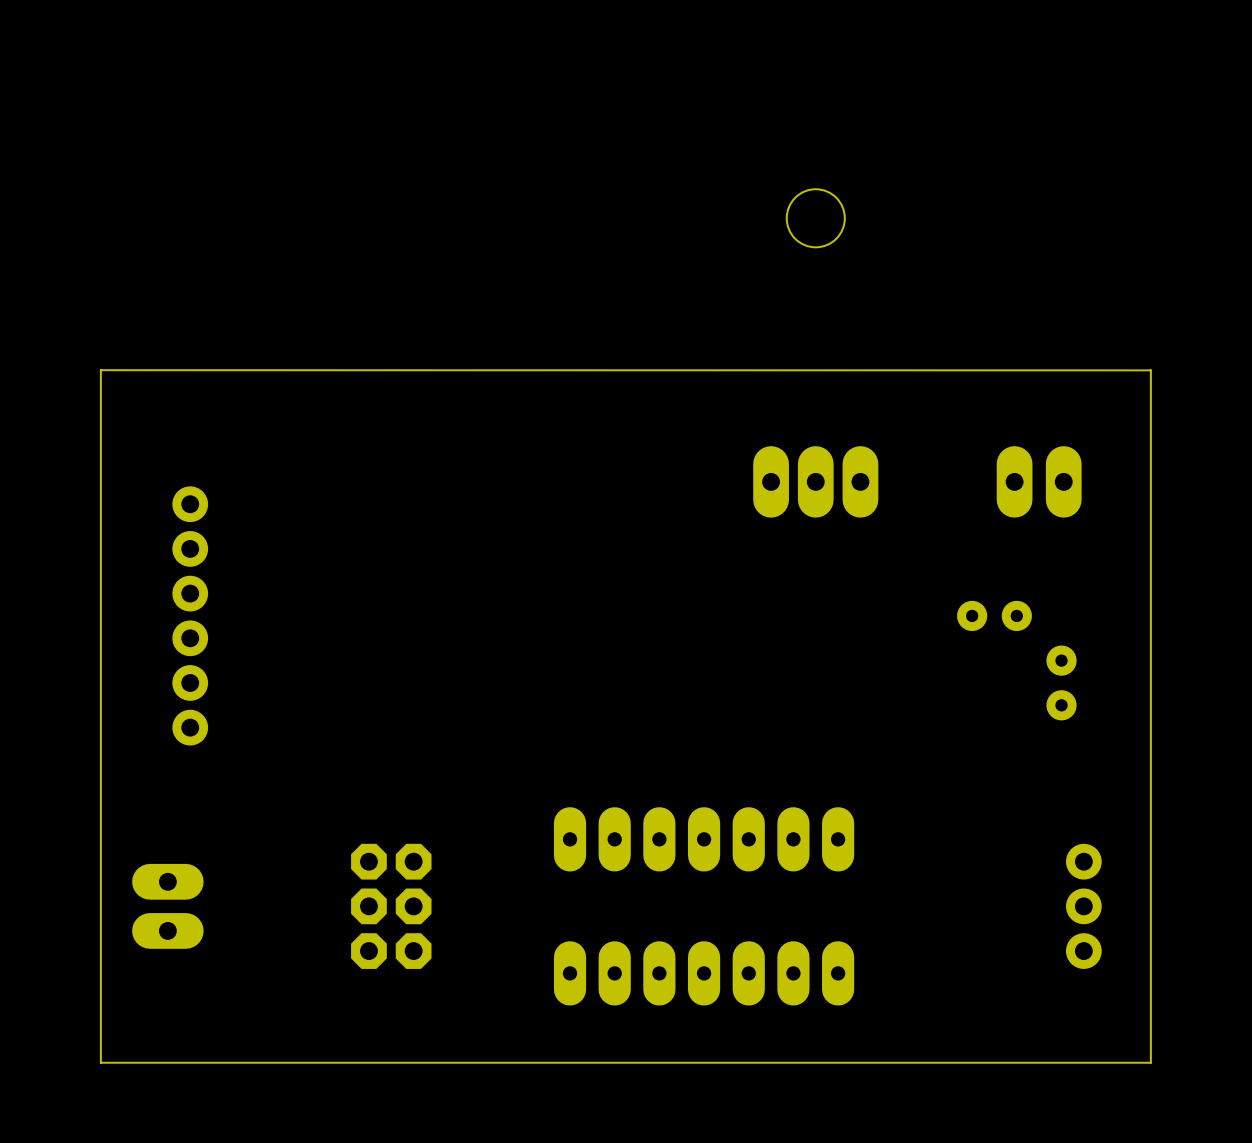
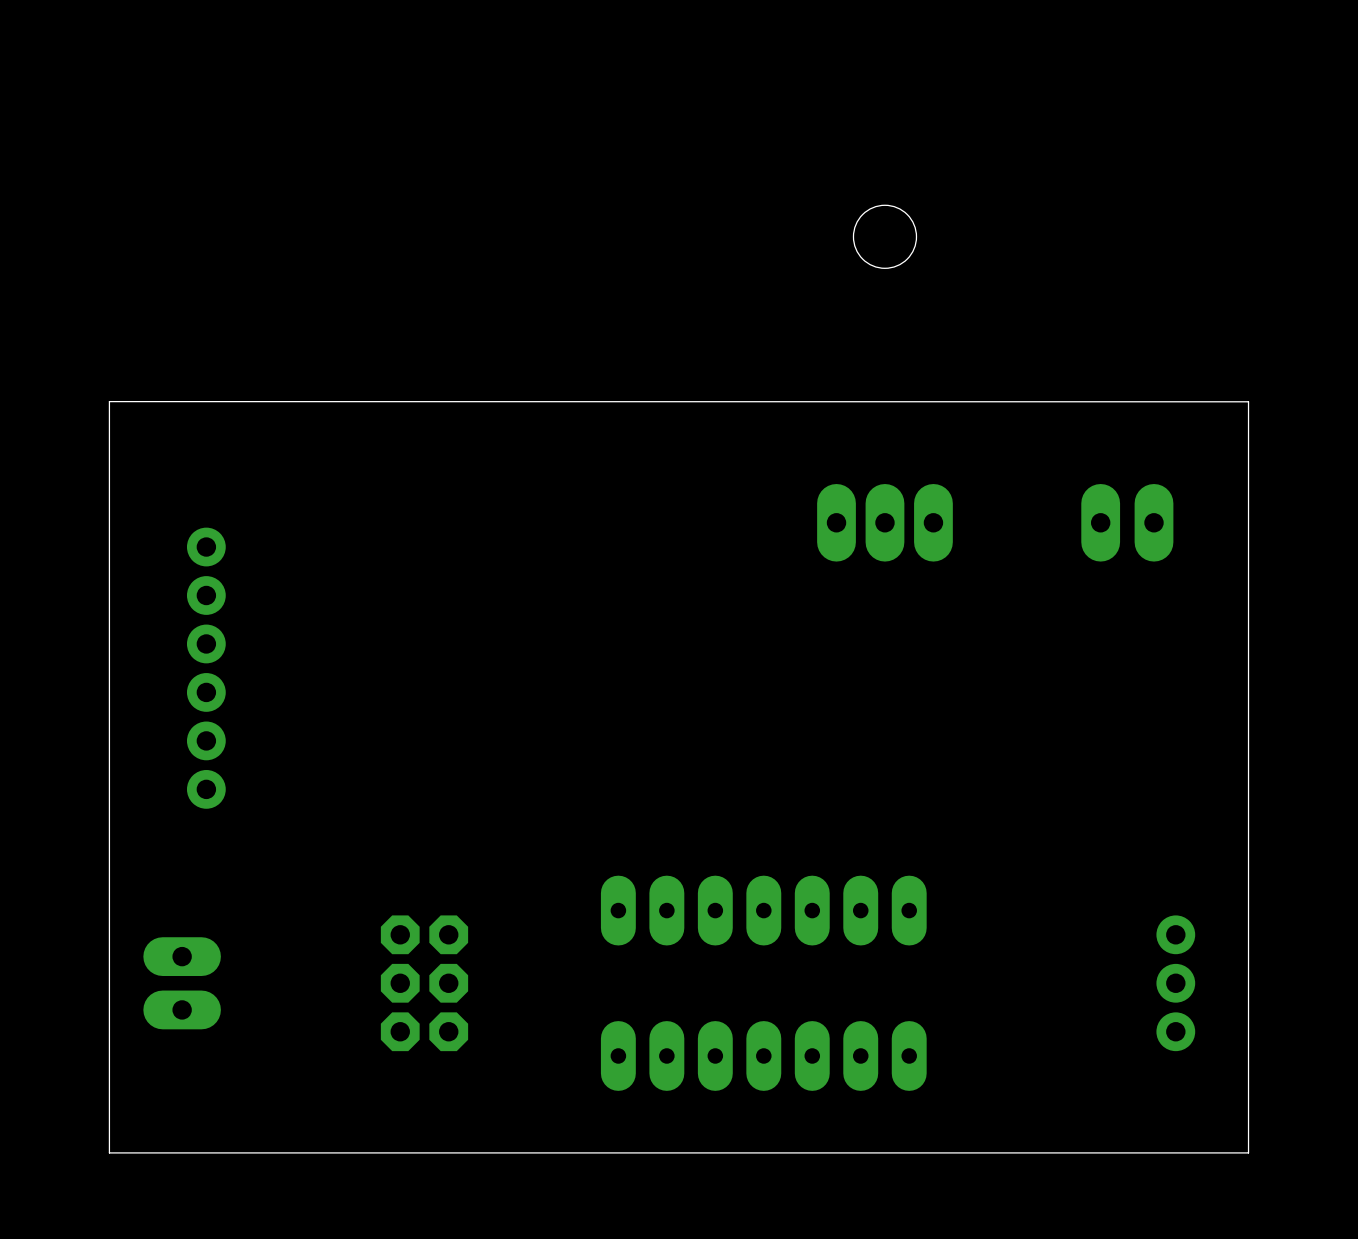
part: (994, 615) -> none
part: (1061, 682) -> none

